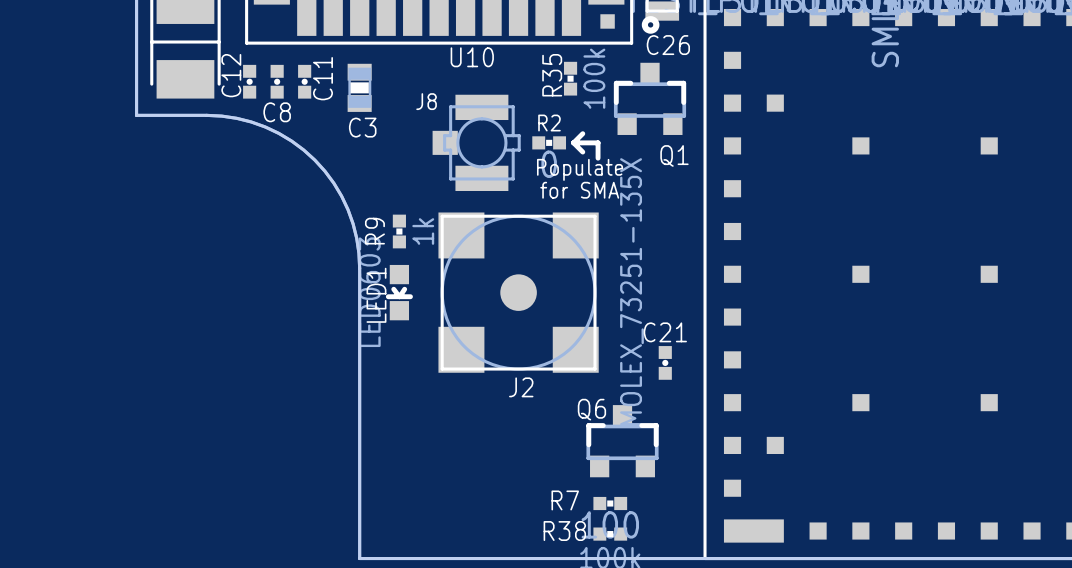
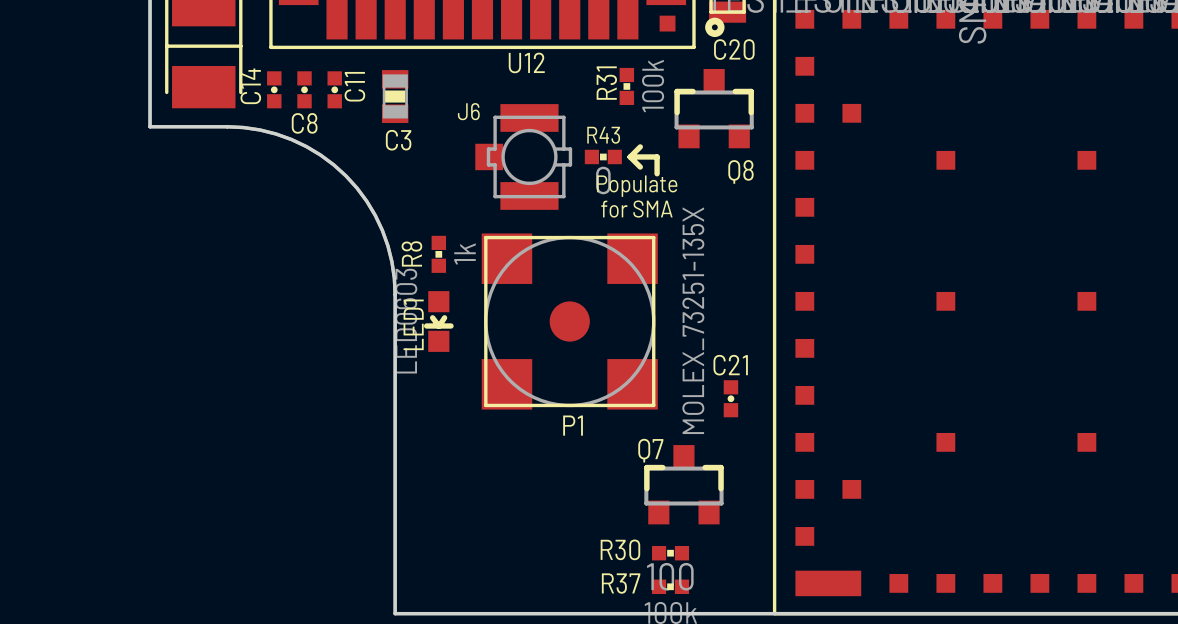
C26 name: C26 (668, 45) -> C20 (734, 49)
U10 name: U10 (472, 57) -> U12 (526, 62)
C12 name: C12 (231, 75) -> C14 (250, 86)
R35 name: R35 (552, 75) -> R31 (606, 83)
J8 name: J8 (426, 101) -> J6 (468, 111)
R2 name: R2 (549, 123) -> R43 (603, 135)
Q1 name: Q1 (674, 155) -> Q8 (740, 171)
R9 name: R9 (374, 231) -> R8 (411, 253)
J2 name: J2 (521, 387) -> P1 (573, 425)
Q6 name: Q6 (591, 409) -> Q7 (650, 450)
R7 name: R7 (565, 500) -> R30 (620, 549)
R38 name: R38 (564, 531) -> R37 (621, 583)

